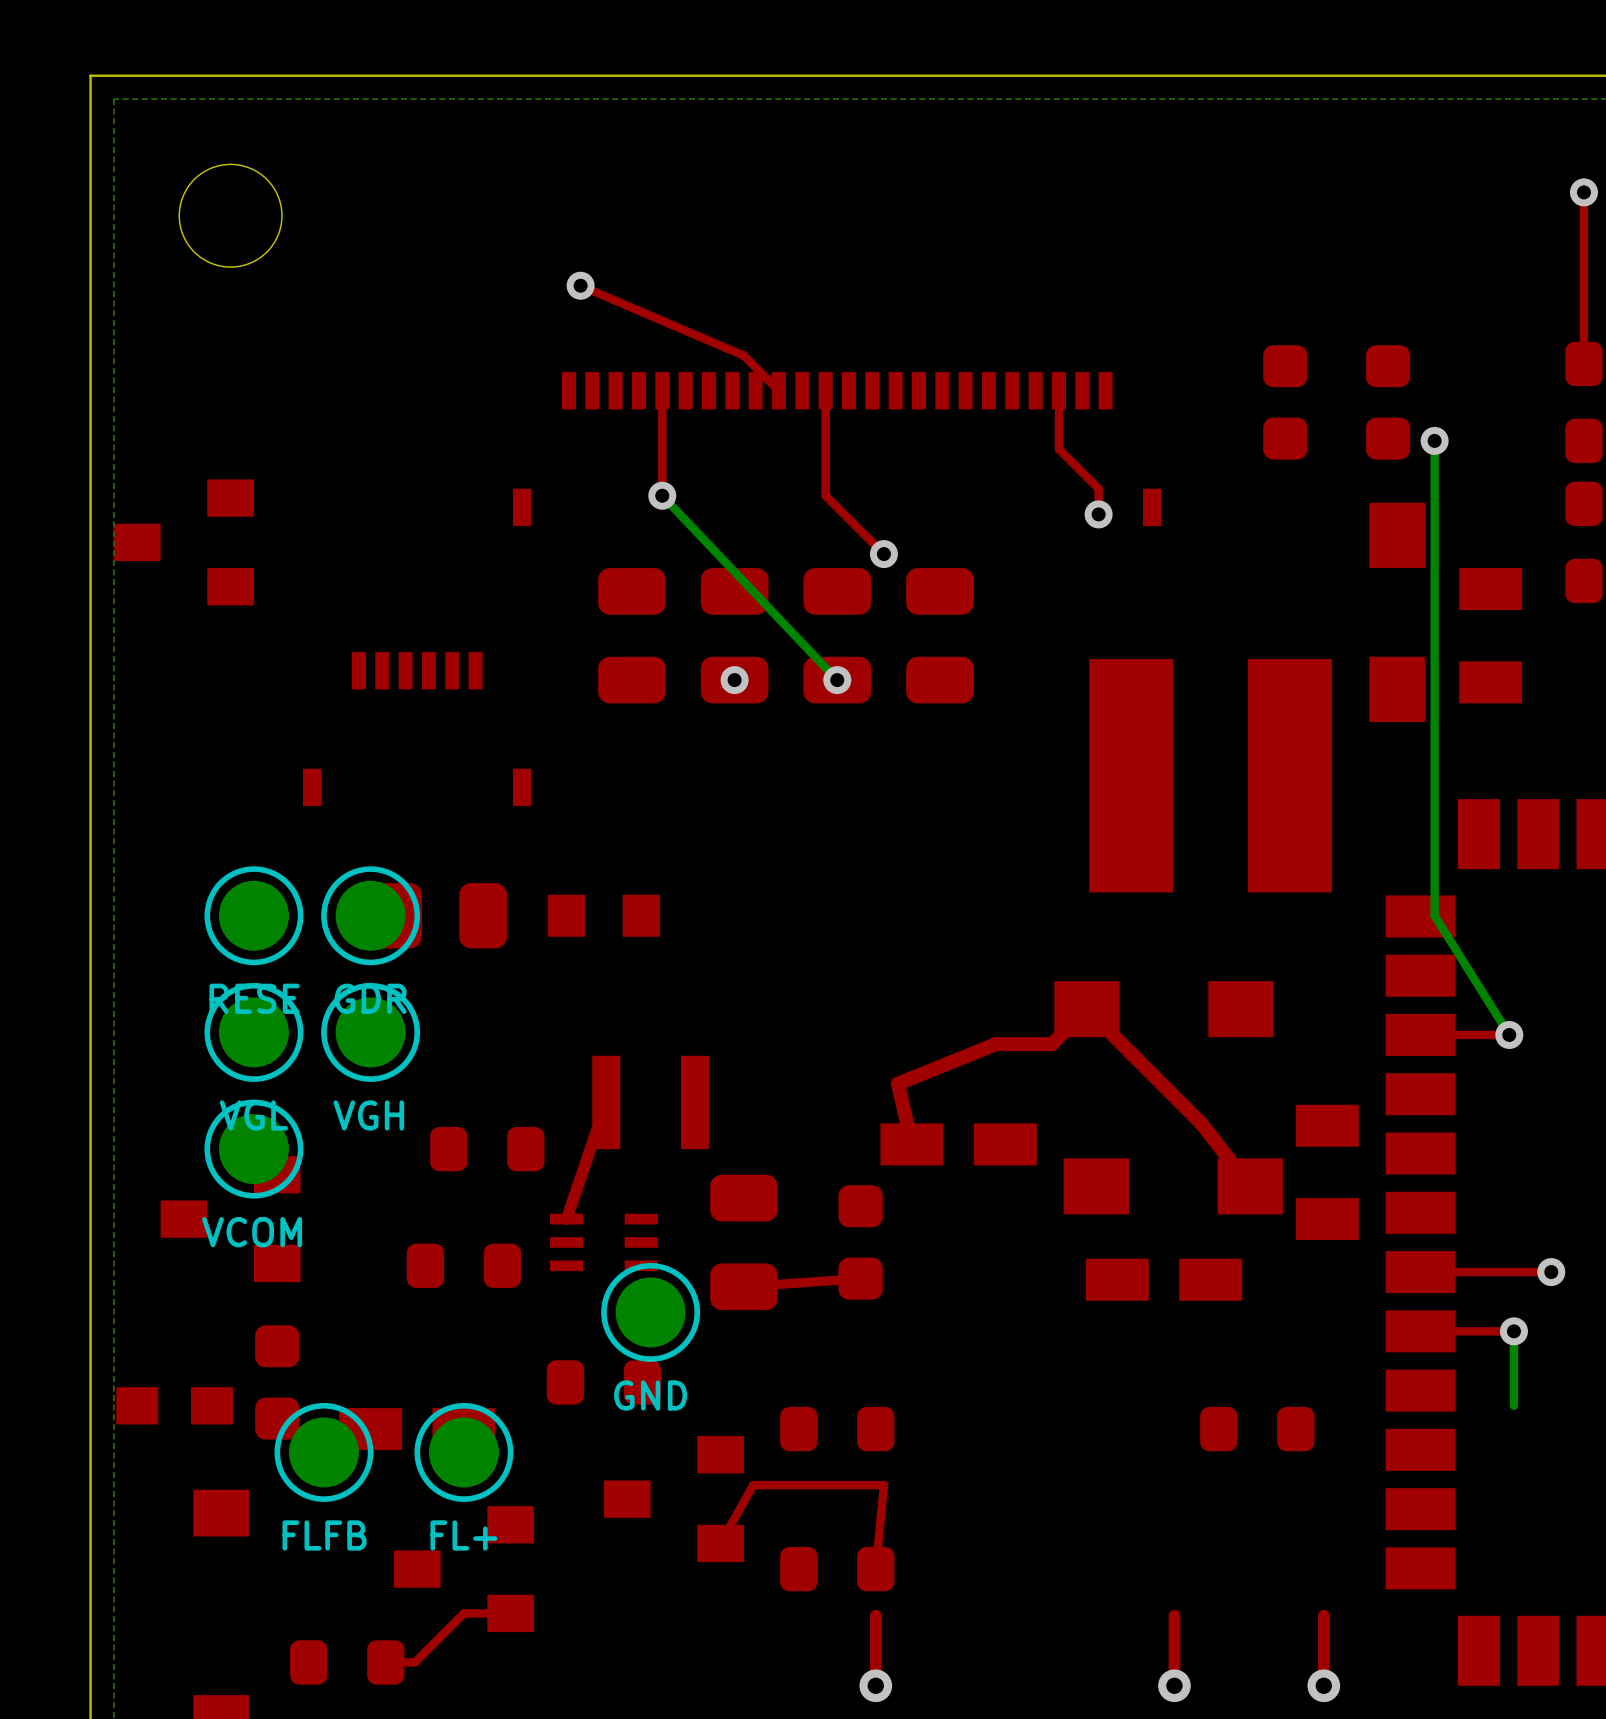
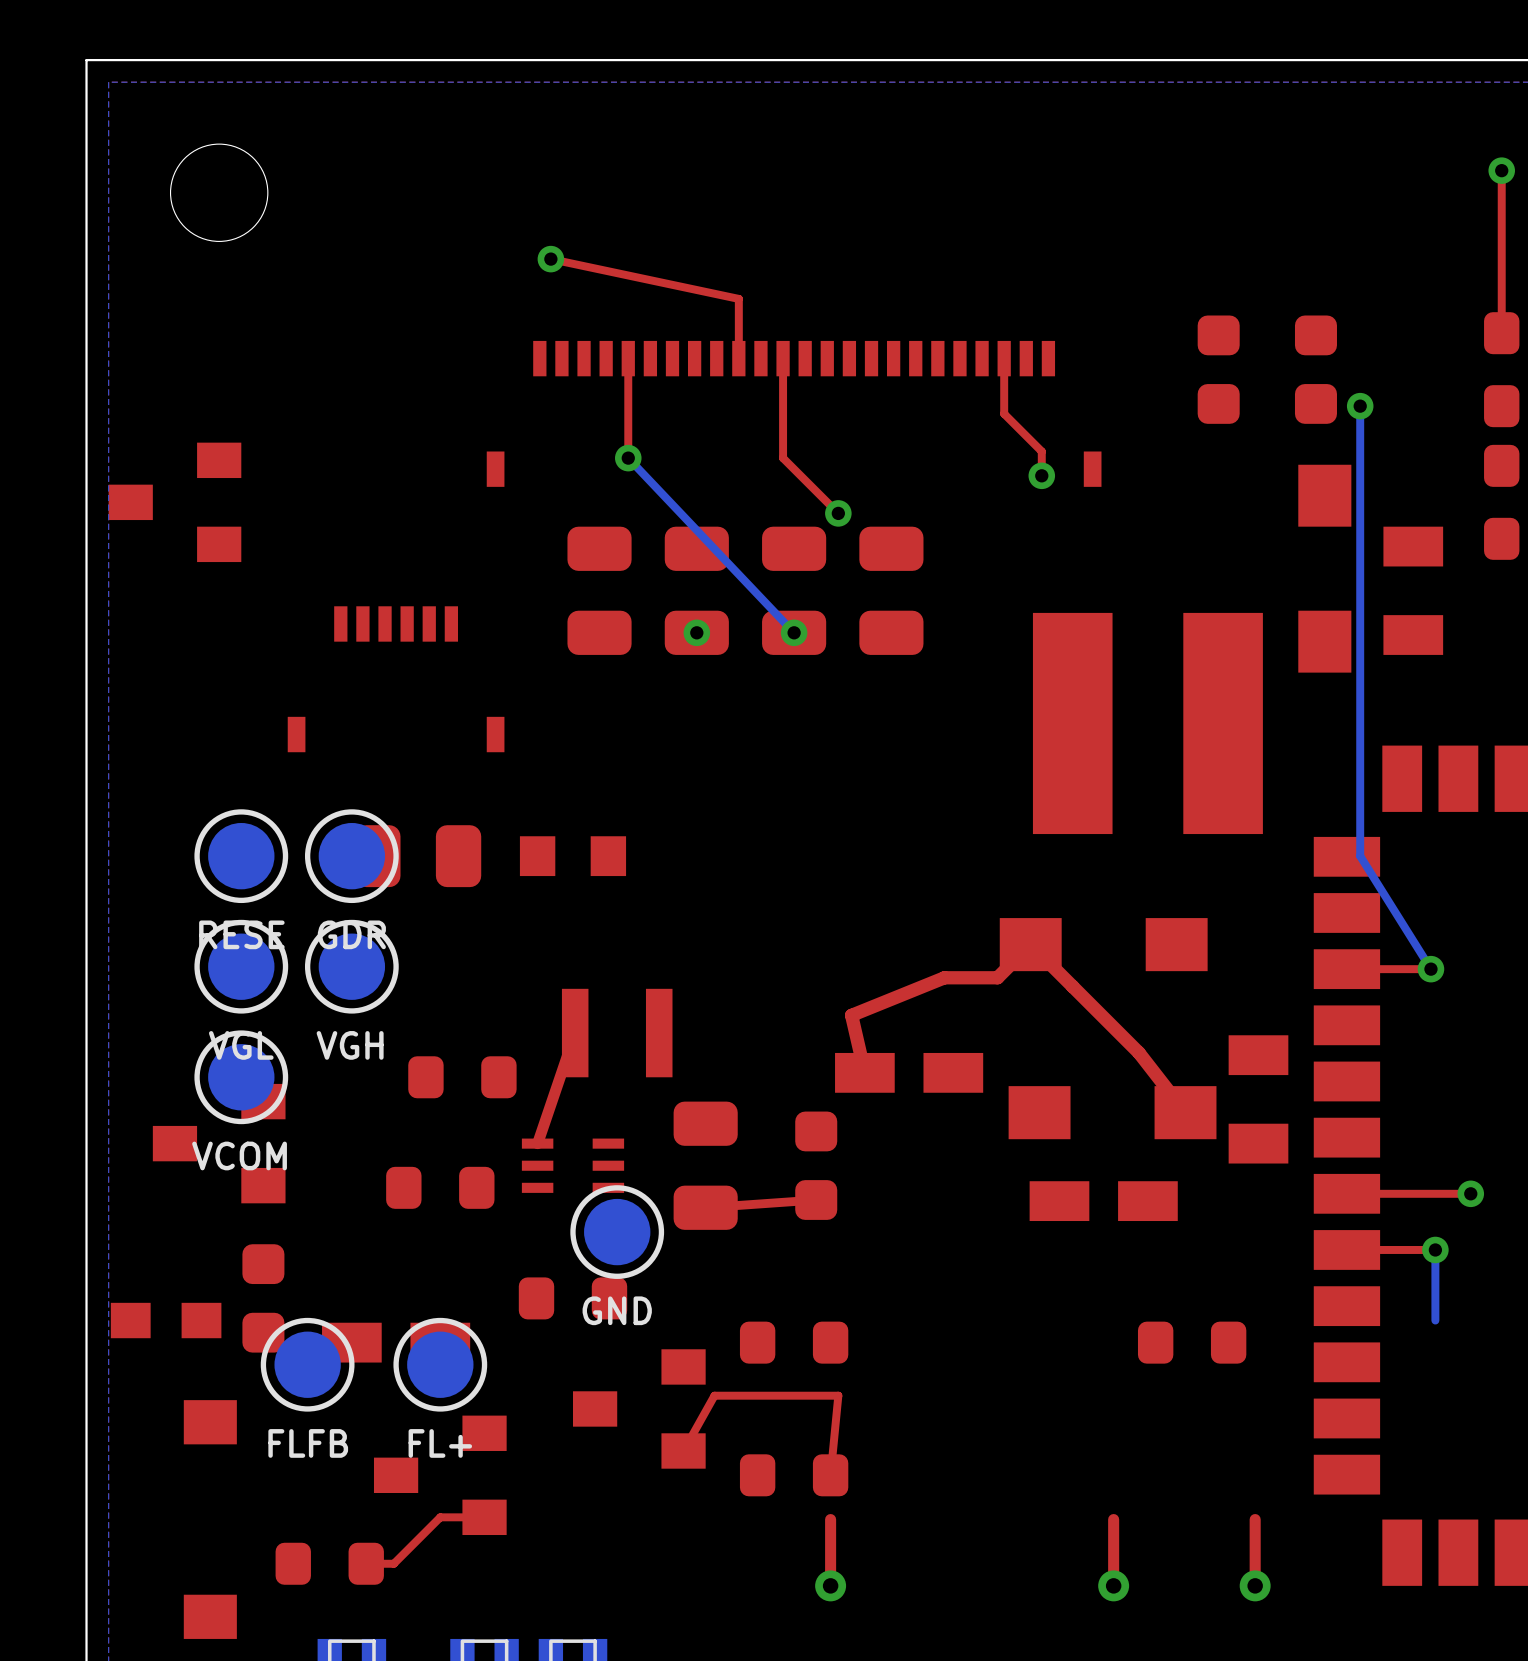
top track: (580, 285) (743, 355) (778, 390) -> (550, 259) (738, 298) (738, 358)

